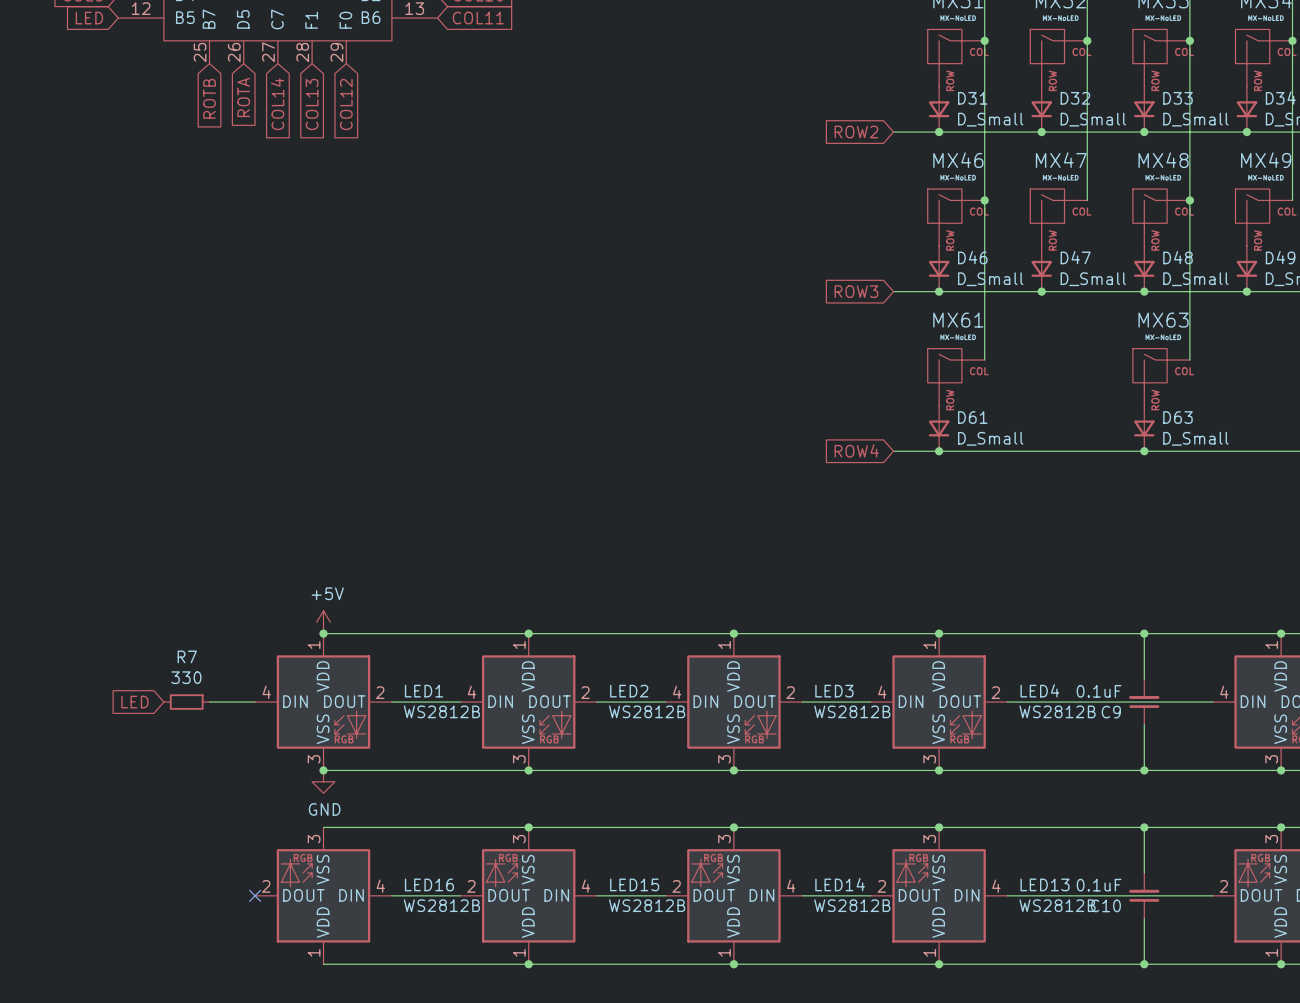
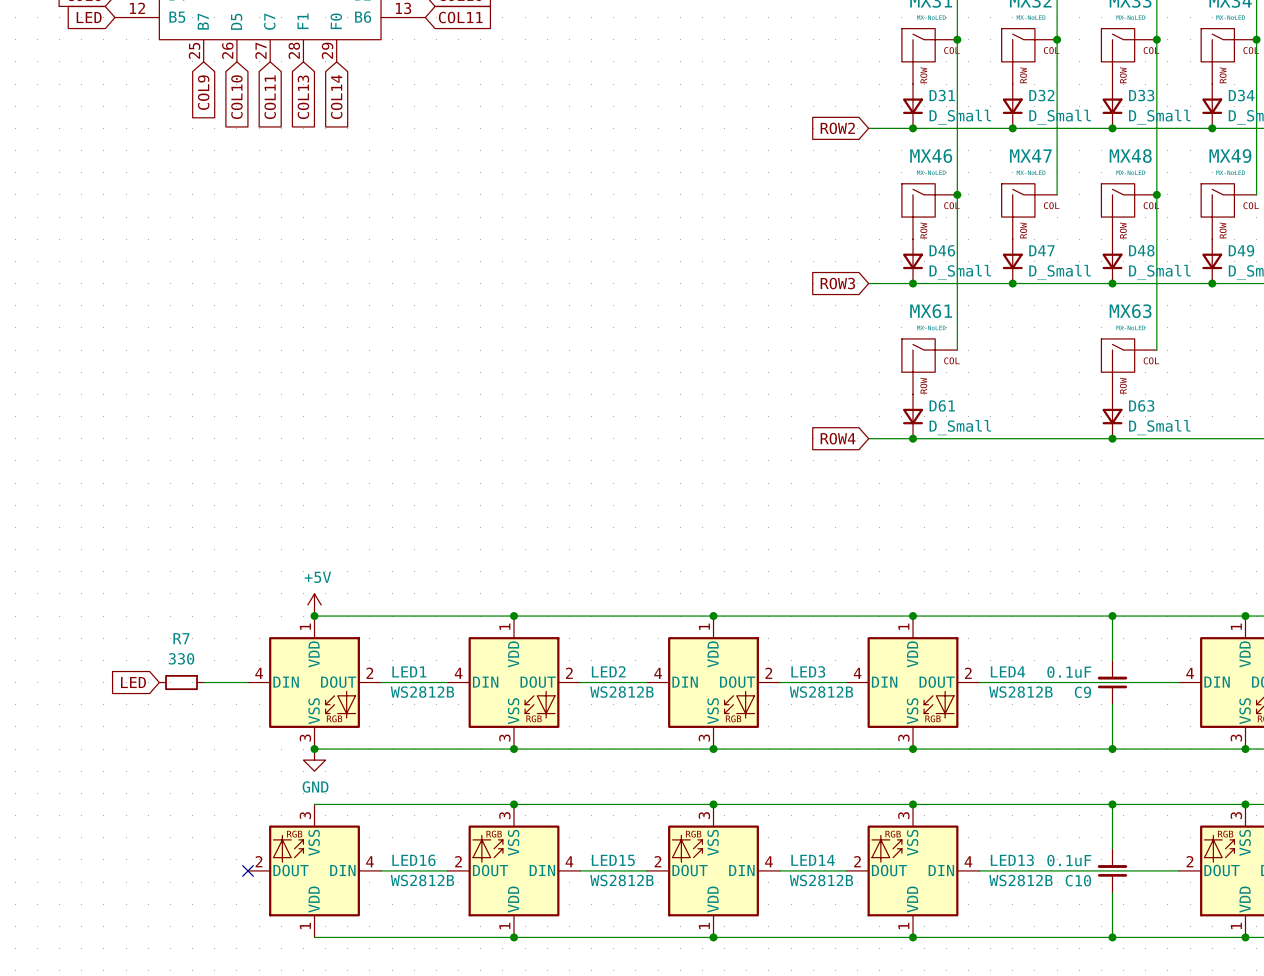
global label: ROTA (243, 97) -> COL10 (236, 97)
global label: ROTB (209, 98) -> COL9 (203, 92)
global label: COL14 (277, 104) -> COL11 (270, 97)
global label: COL12 (346, 104) -> COL14 (336, 97)

